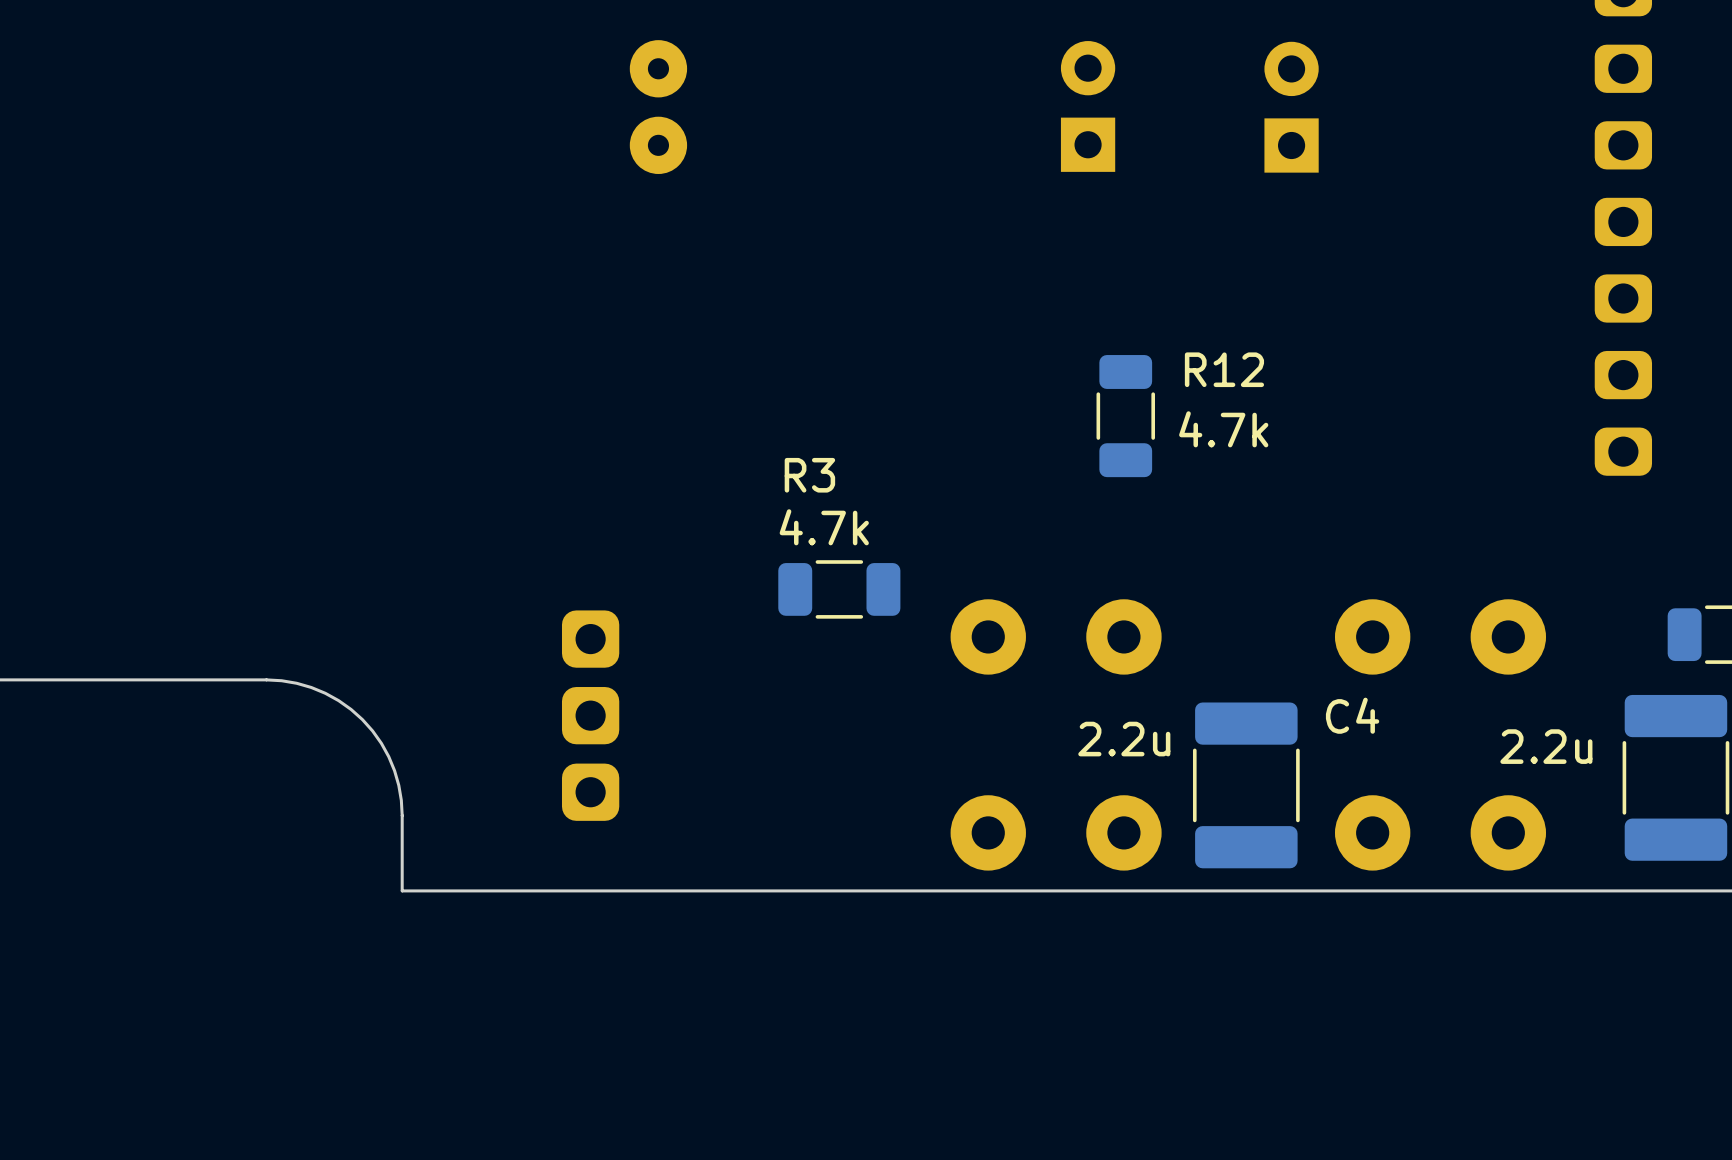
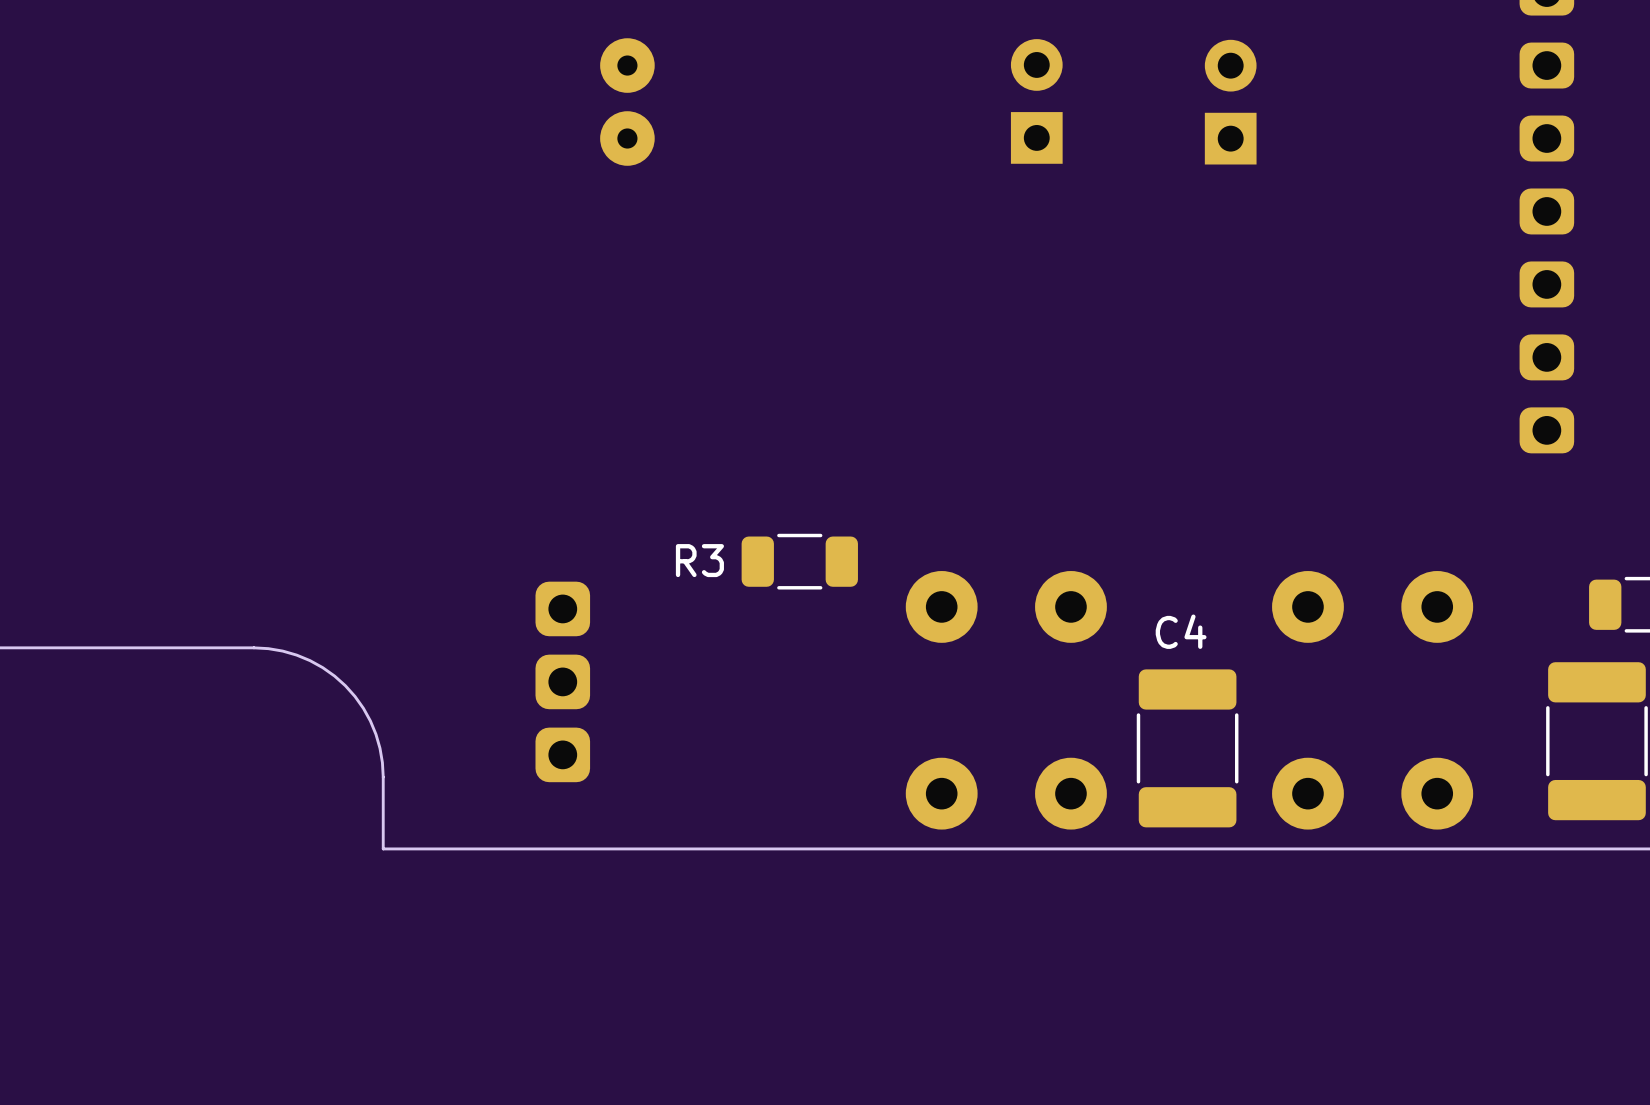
R12: (1125, 416) -> none
text: 4.7k (1223, 429) -> none
R3 name position: R3 (809, 475) -> R3 (699, 560)
text: 4.7k (824, 527) -> none
C4 name position: C4 (1352, 715) -> C4 (1181, 631)
text: 2.2u (1124, 739) -> none
text: 2.2u (1546, 746) -> none

